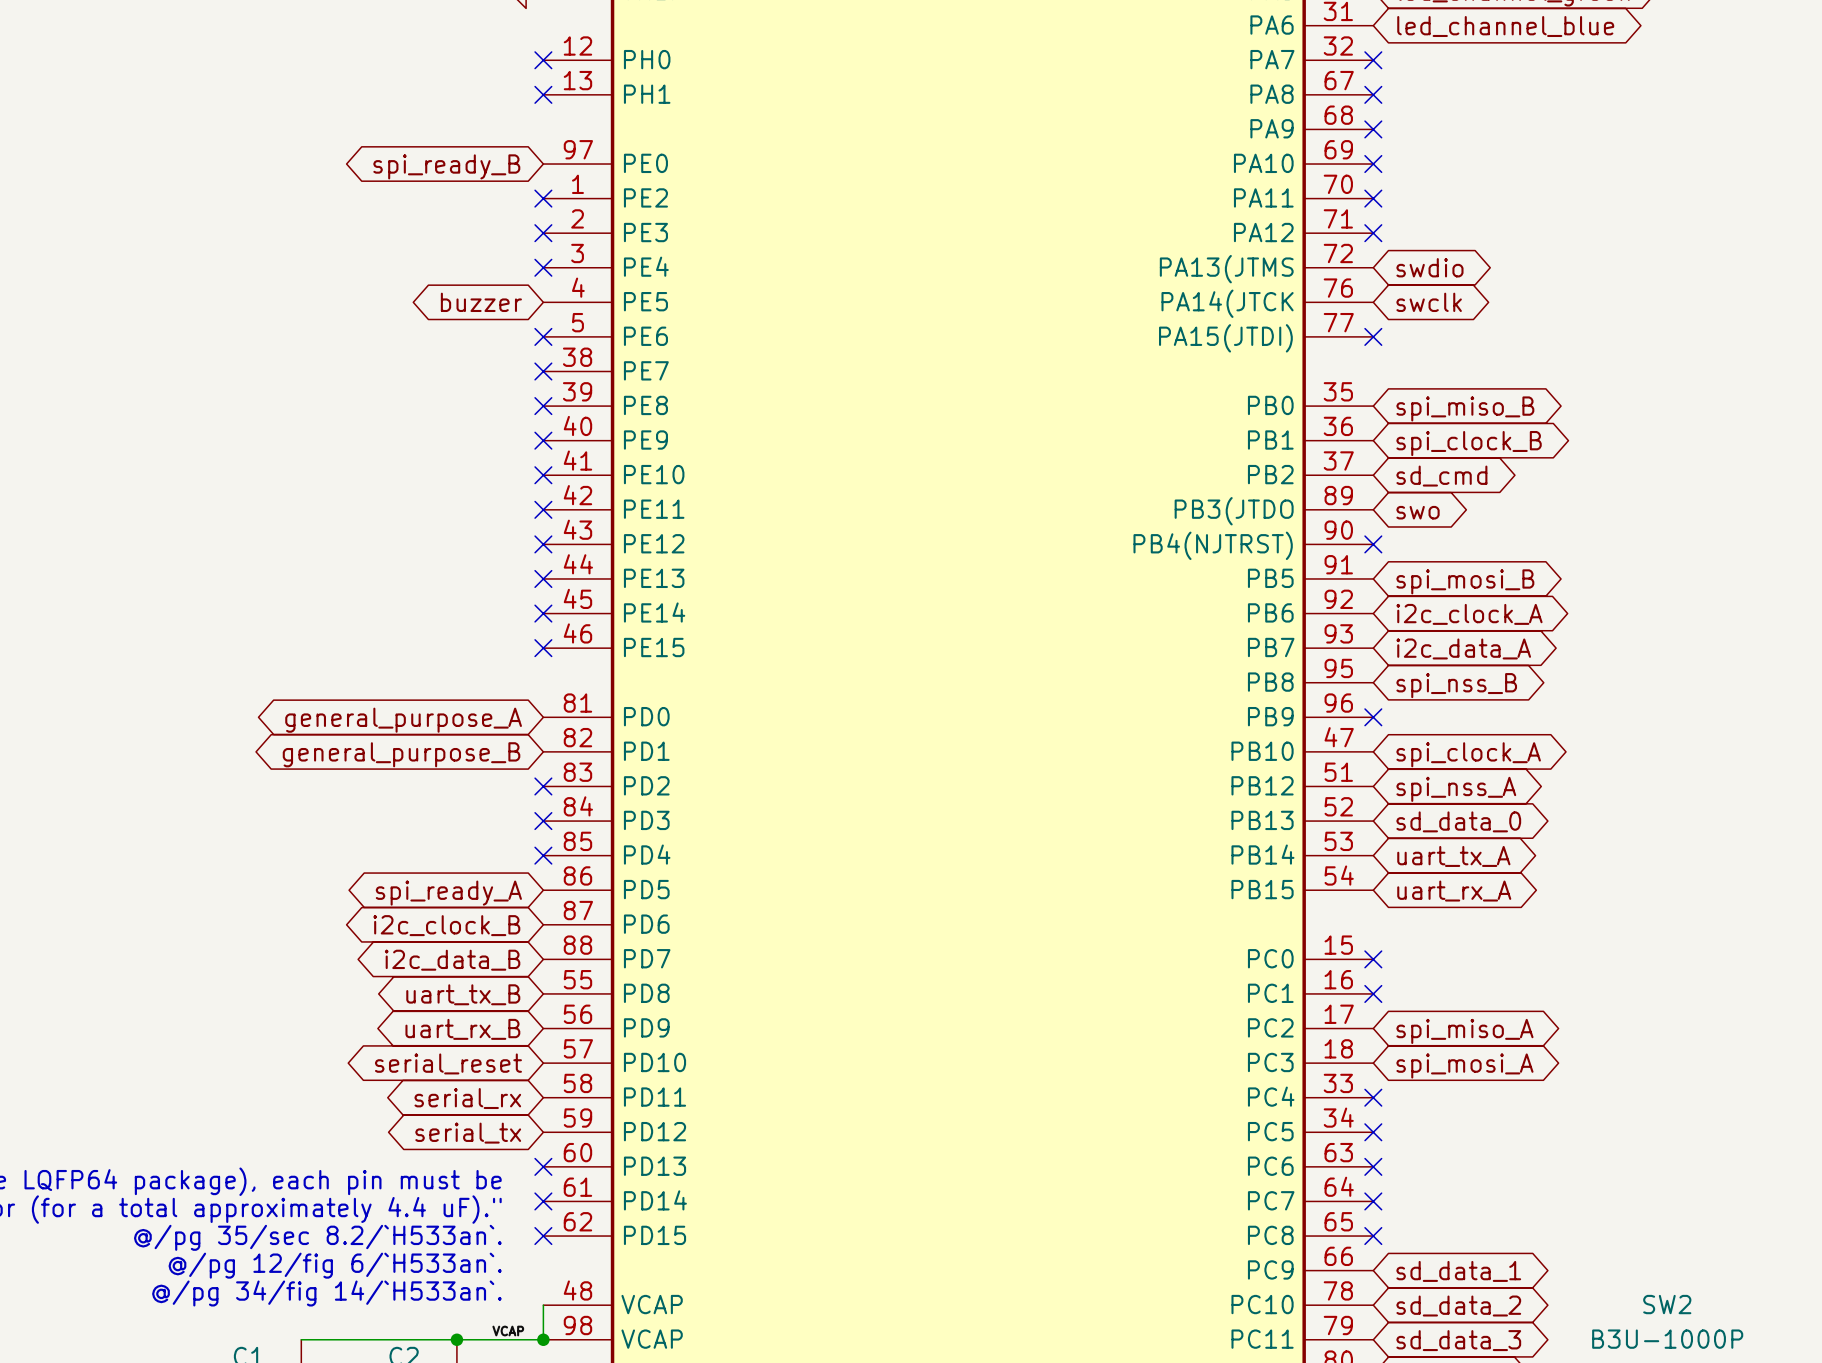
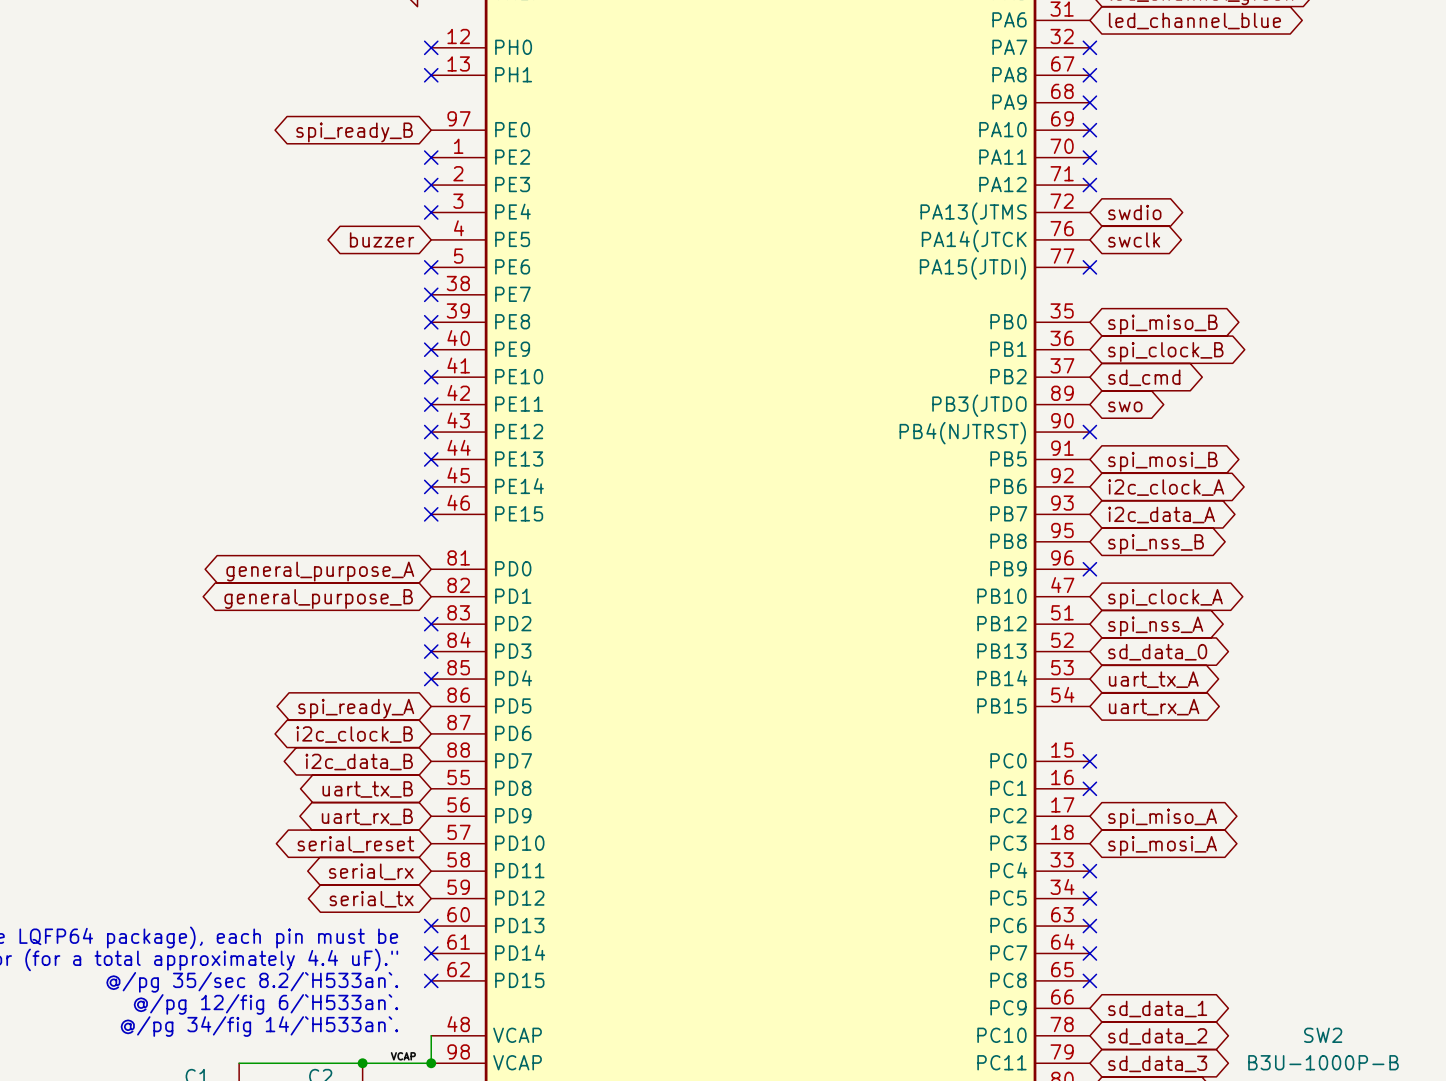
SW2 value: B3U-1000P (1667, 1339) -> B3U-1000P-B (1323, 1062)

